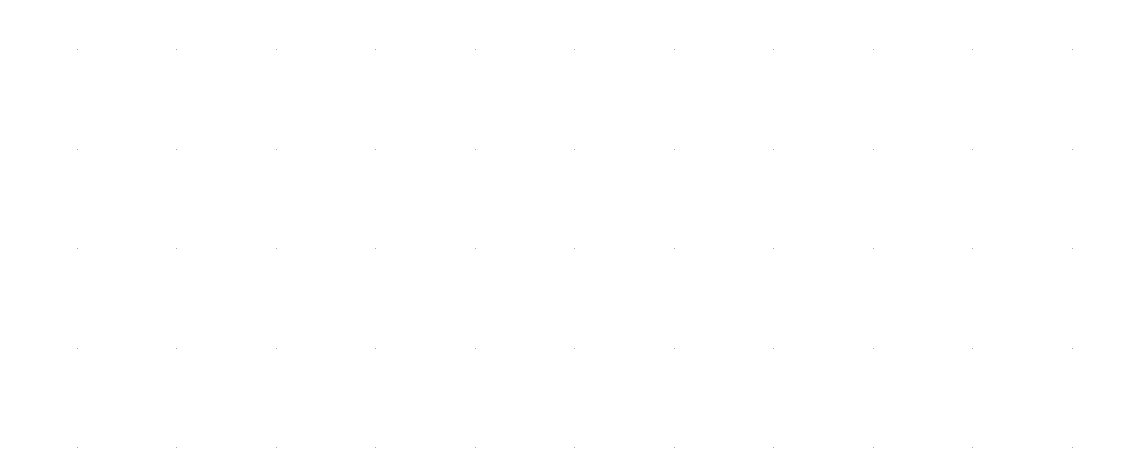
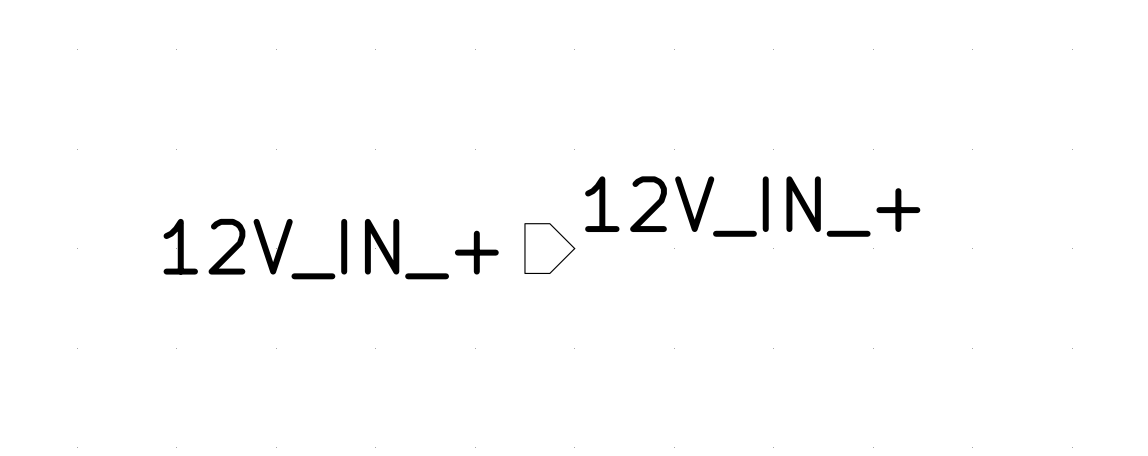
label: none -> 12V_IN_+ (752, 206)
hierarchical label: none -> 12V_IN_+ (331, 249)

